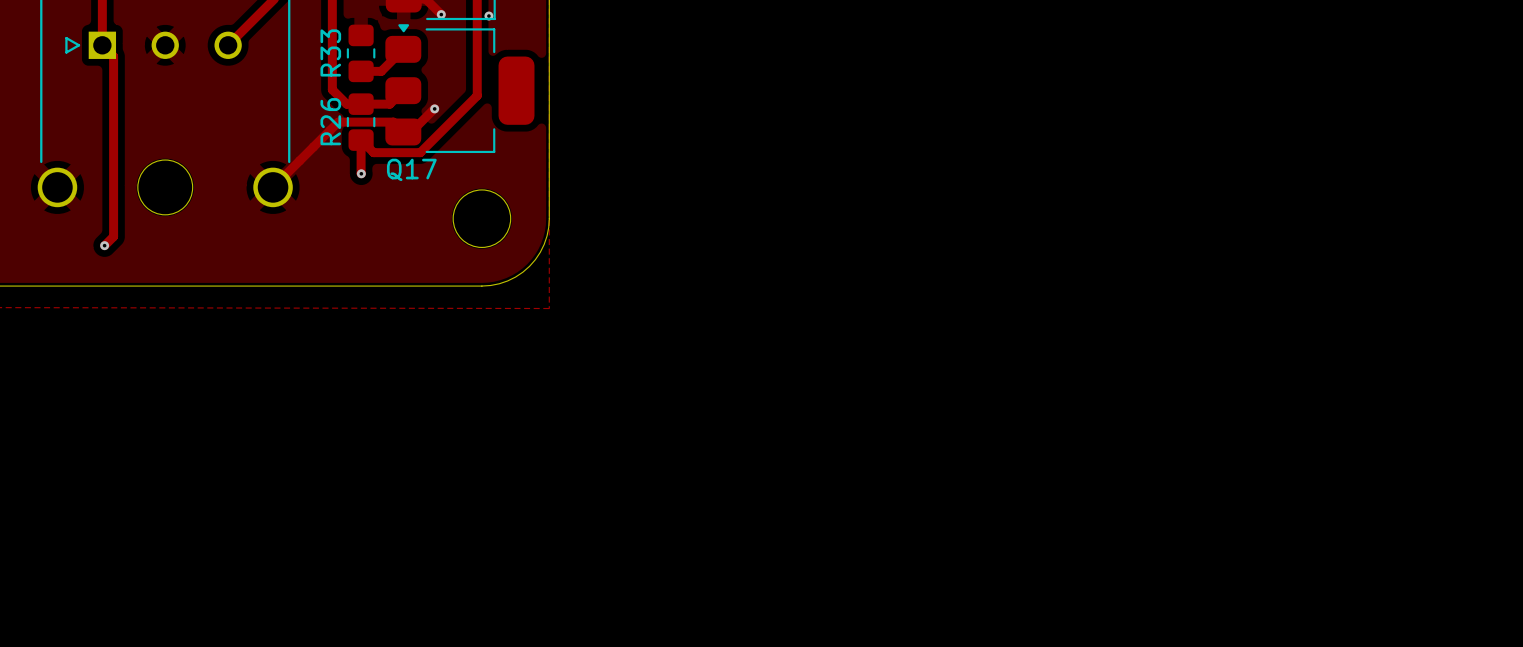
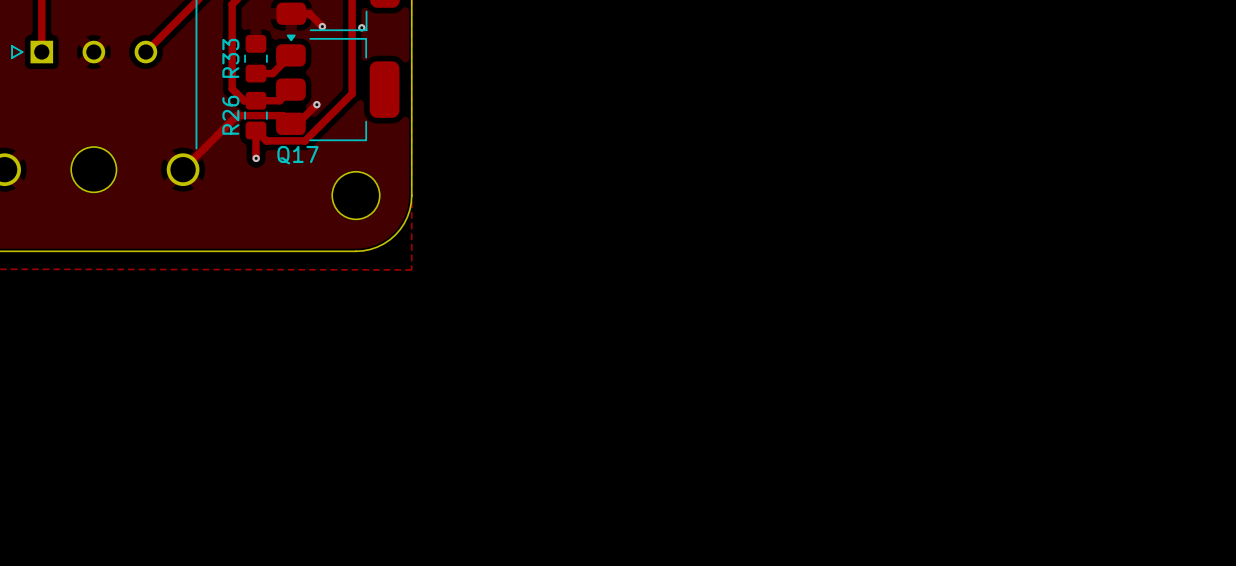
track: (102, 45) (113, 56) (113, 236) (104, 245) -> none
via: (104, 245) -> none

